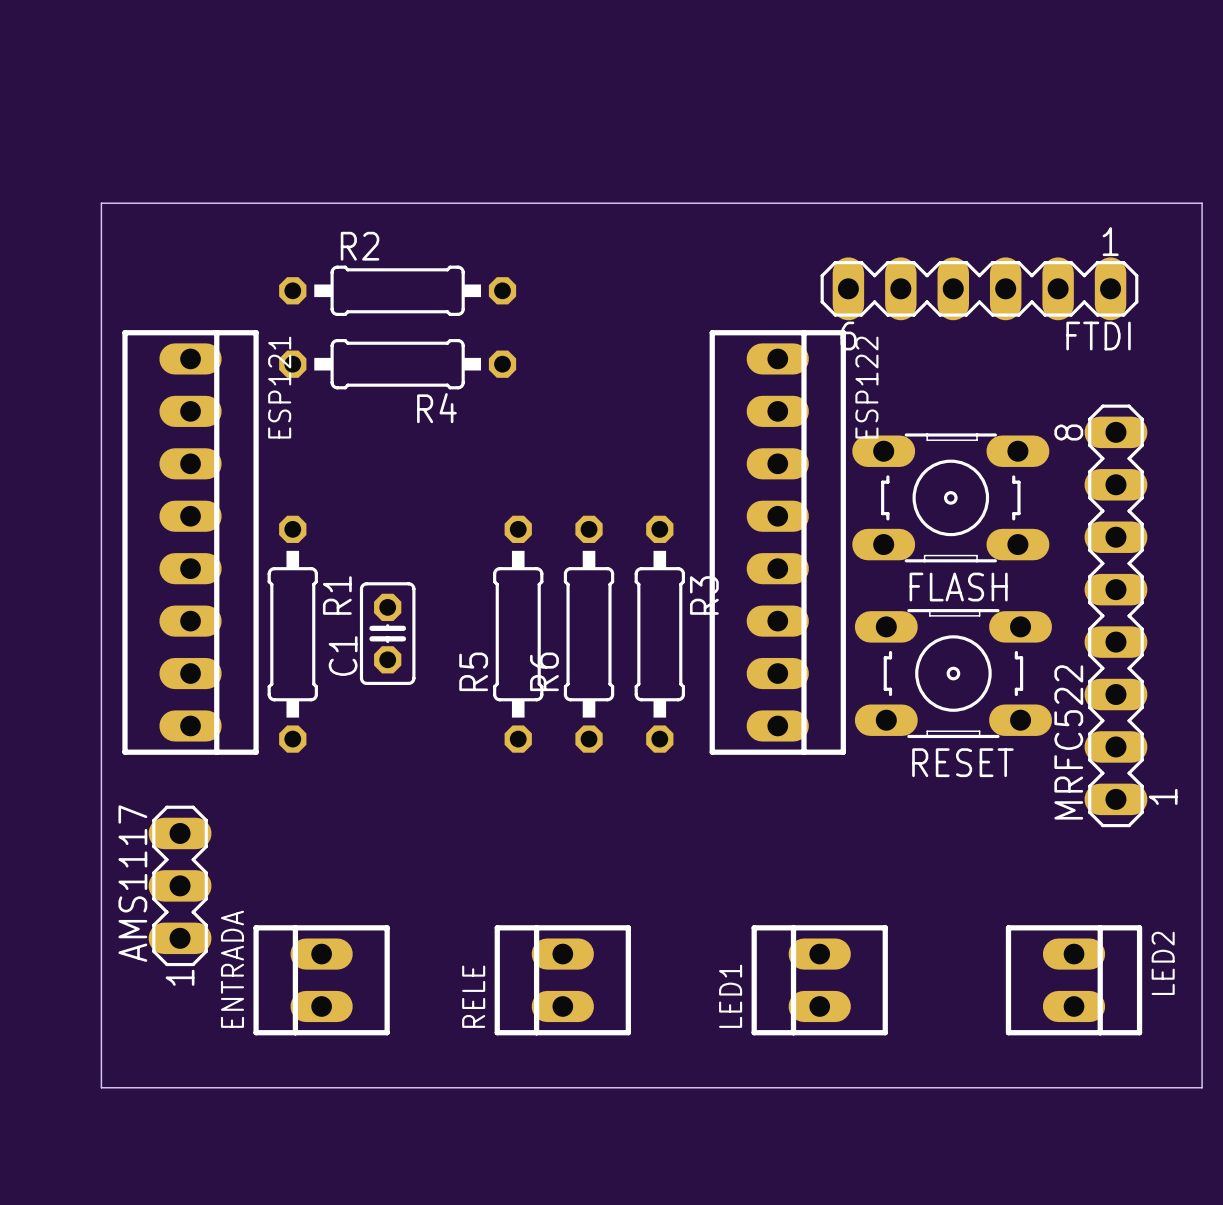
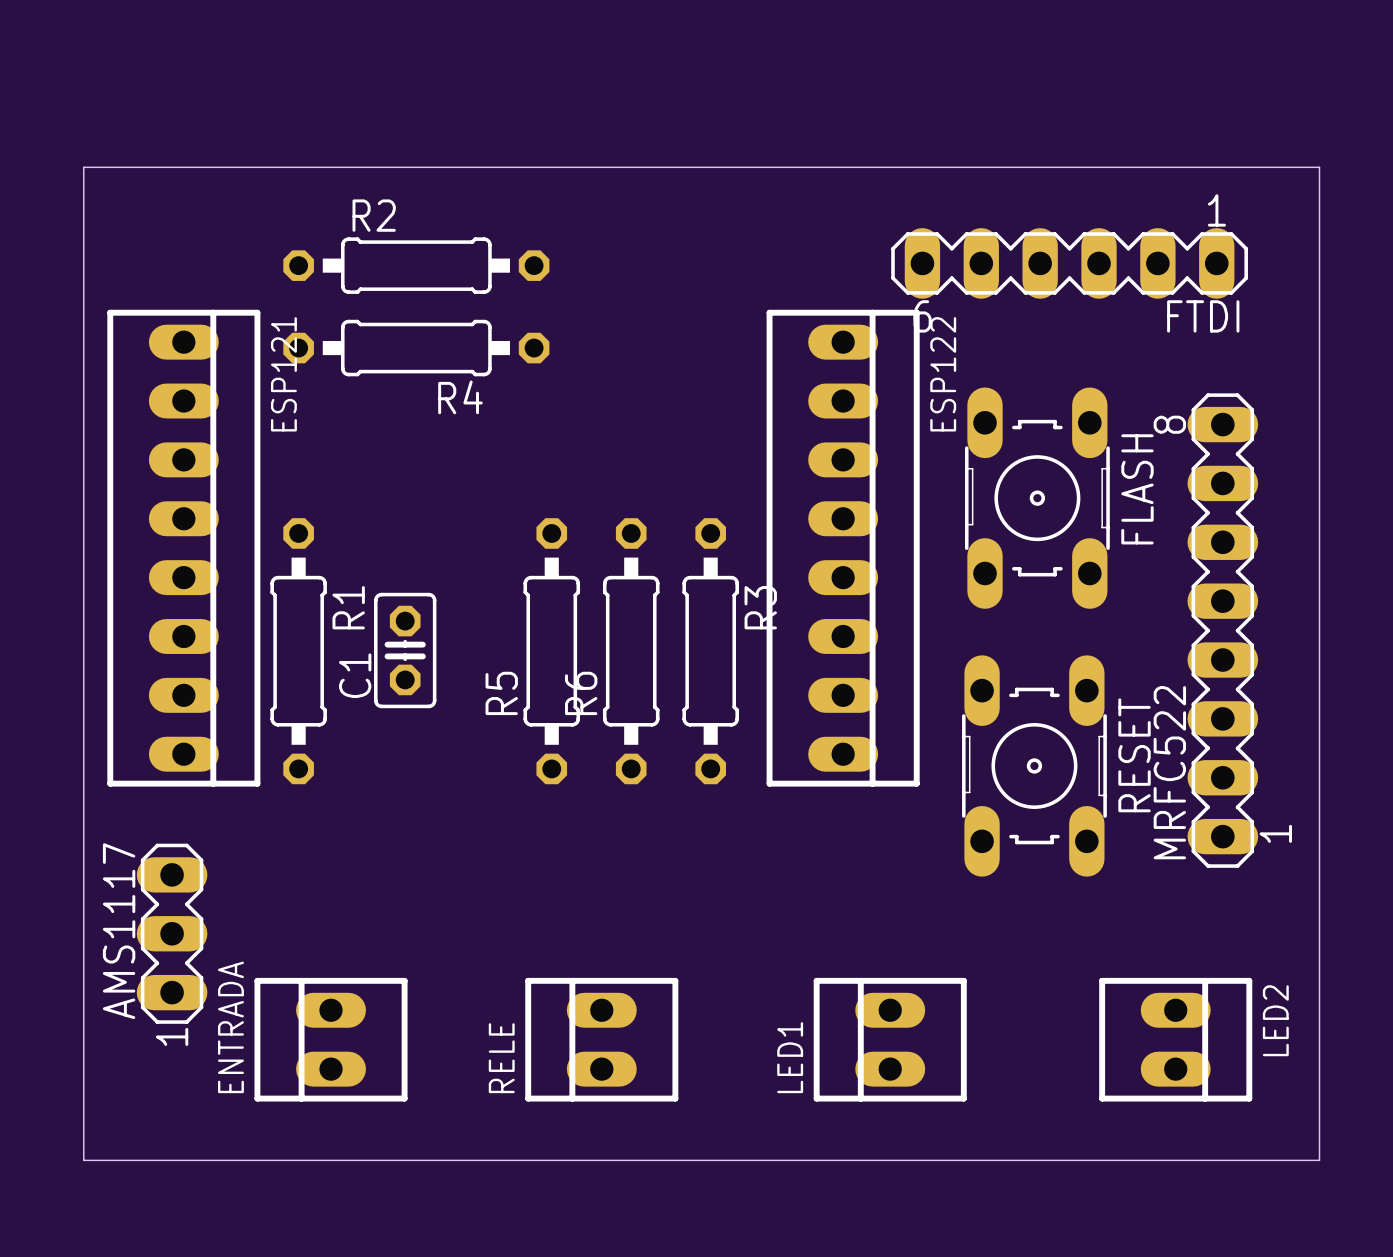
FLASH rotation: 0° (950, 497) -> 90° counterclockwise (1037, 498)
RESET rotation: 0° (953, 673) -> 90° counterclockwise (1034, 765)

